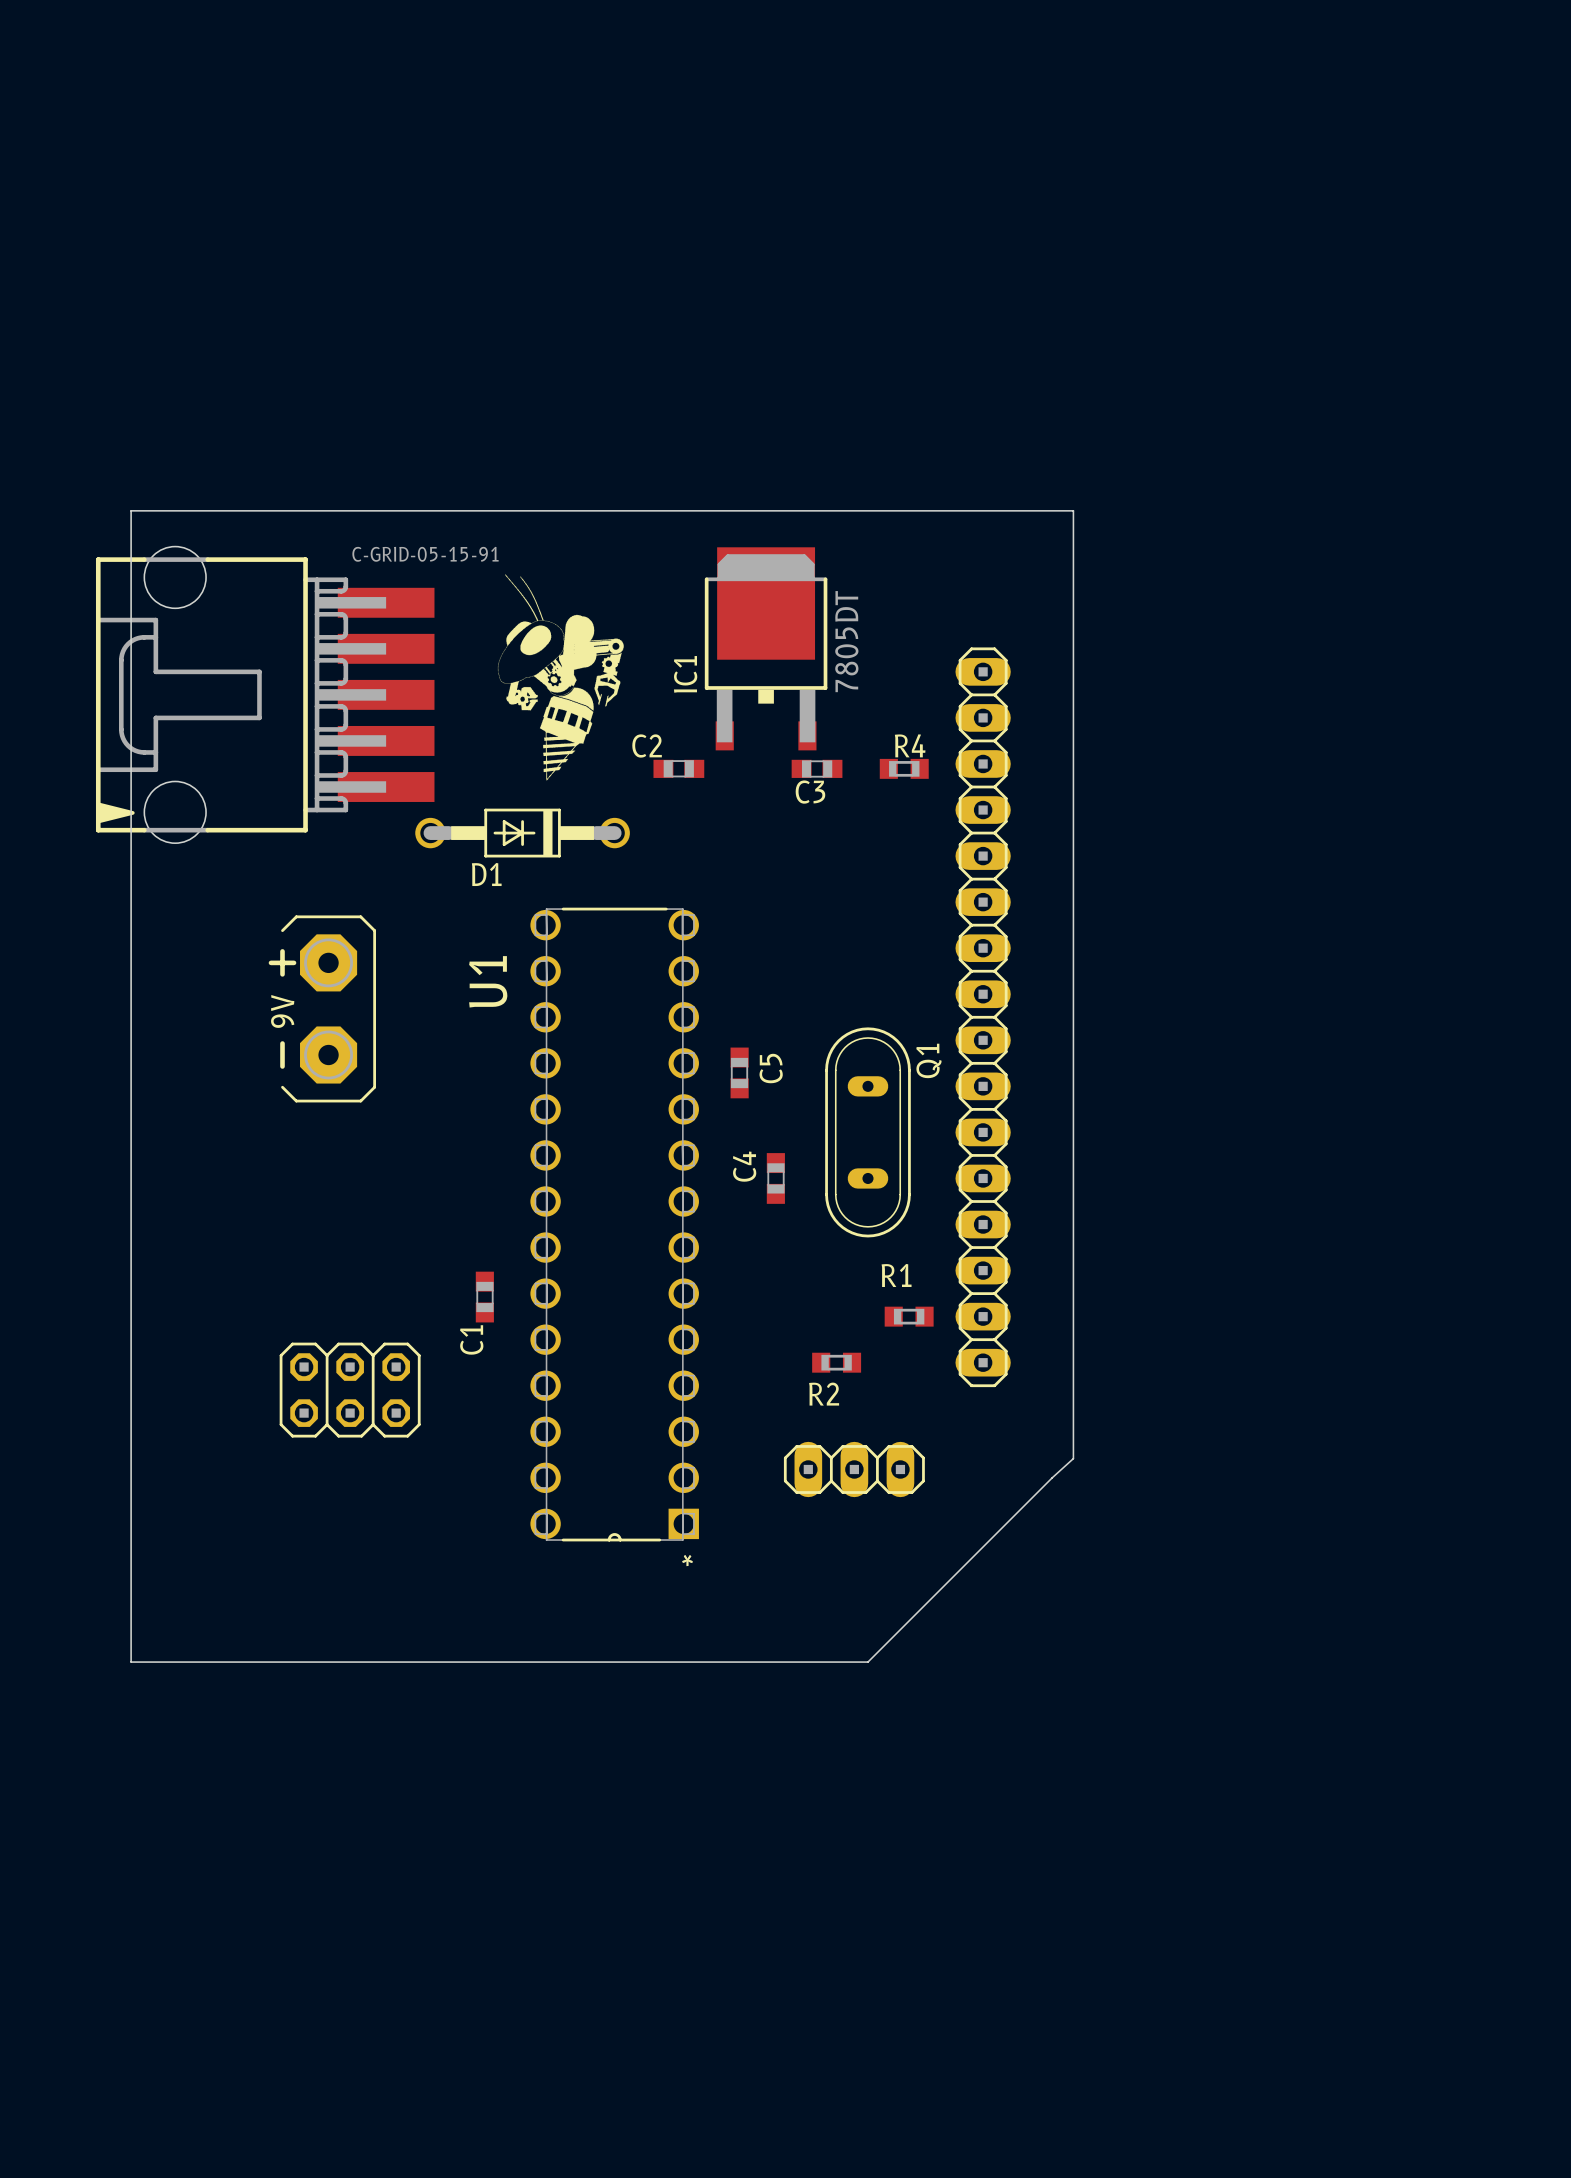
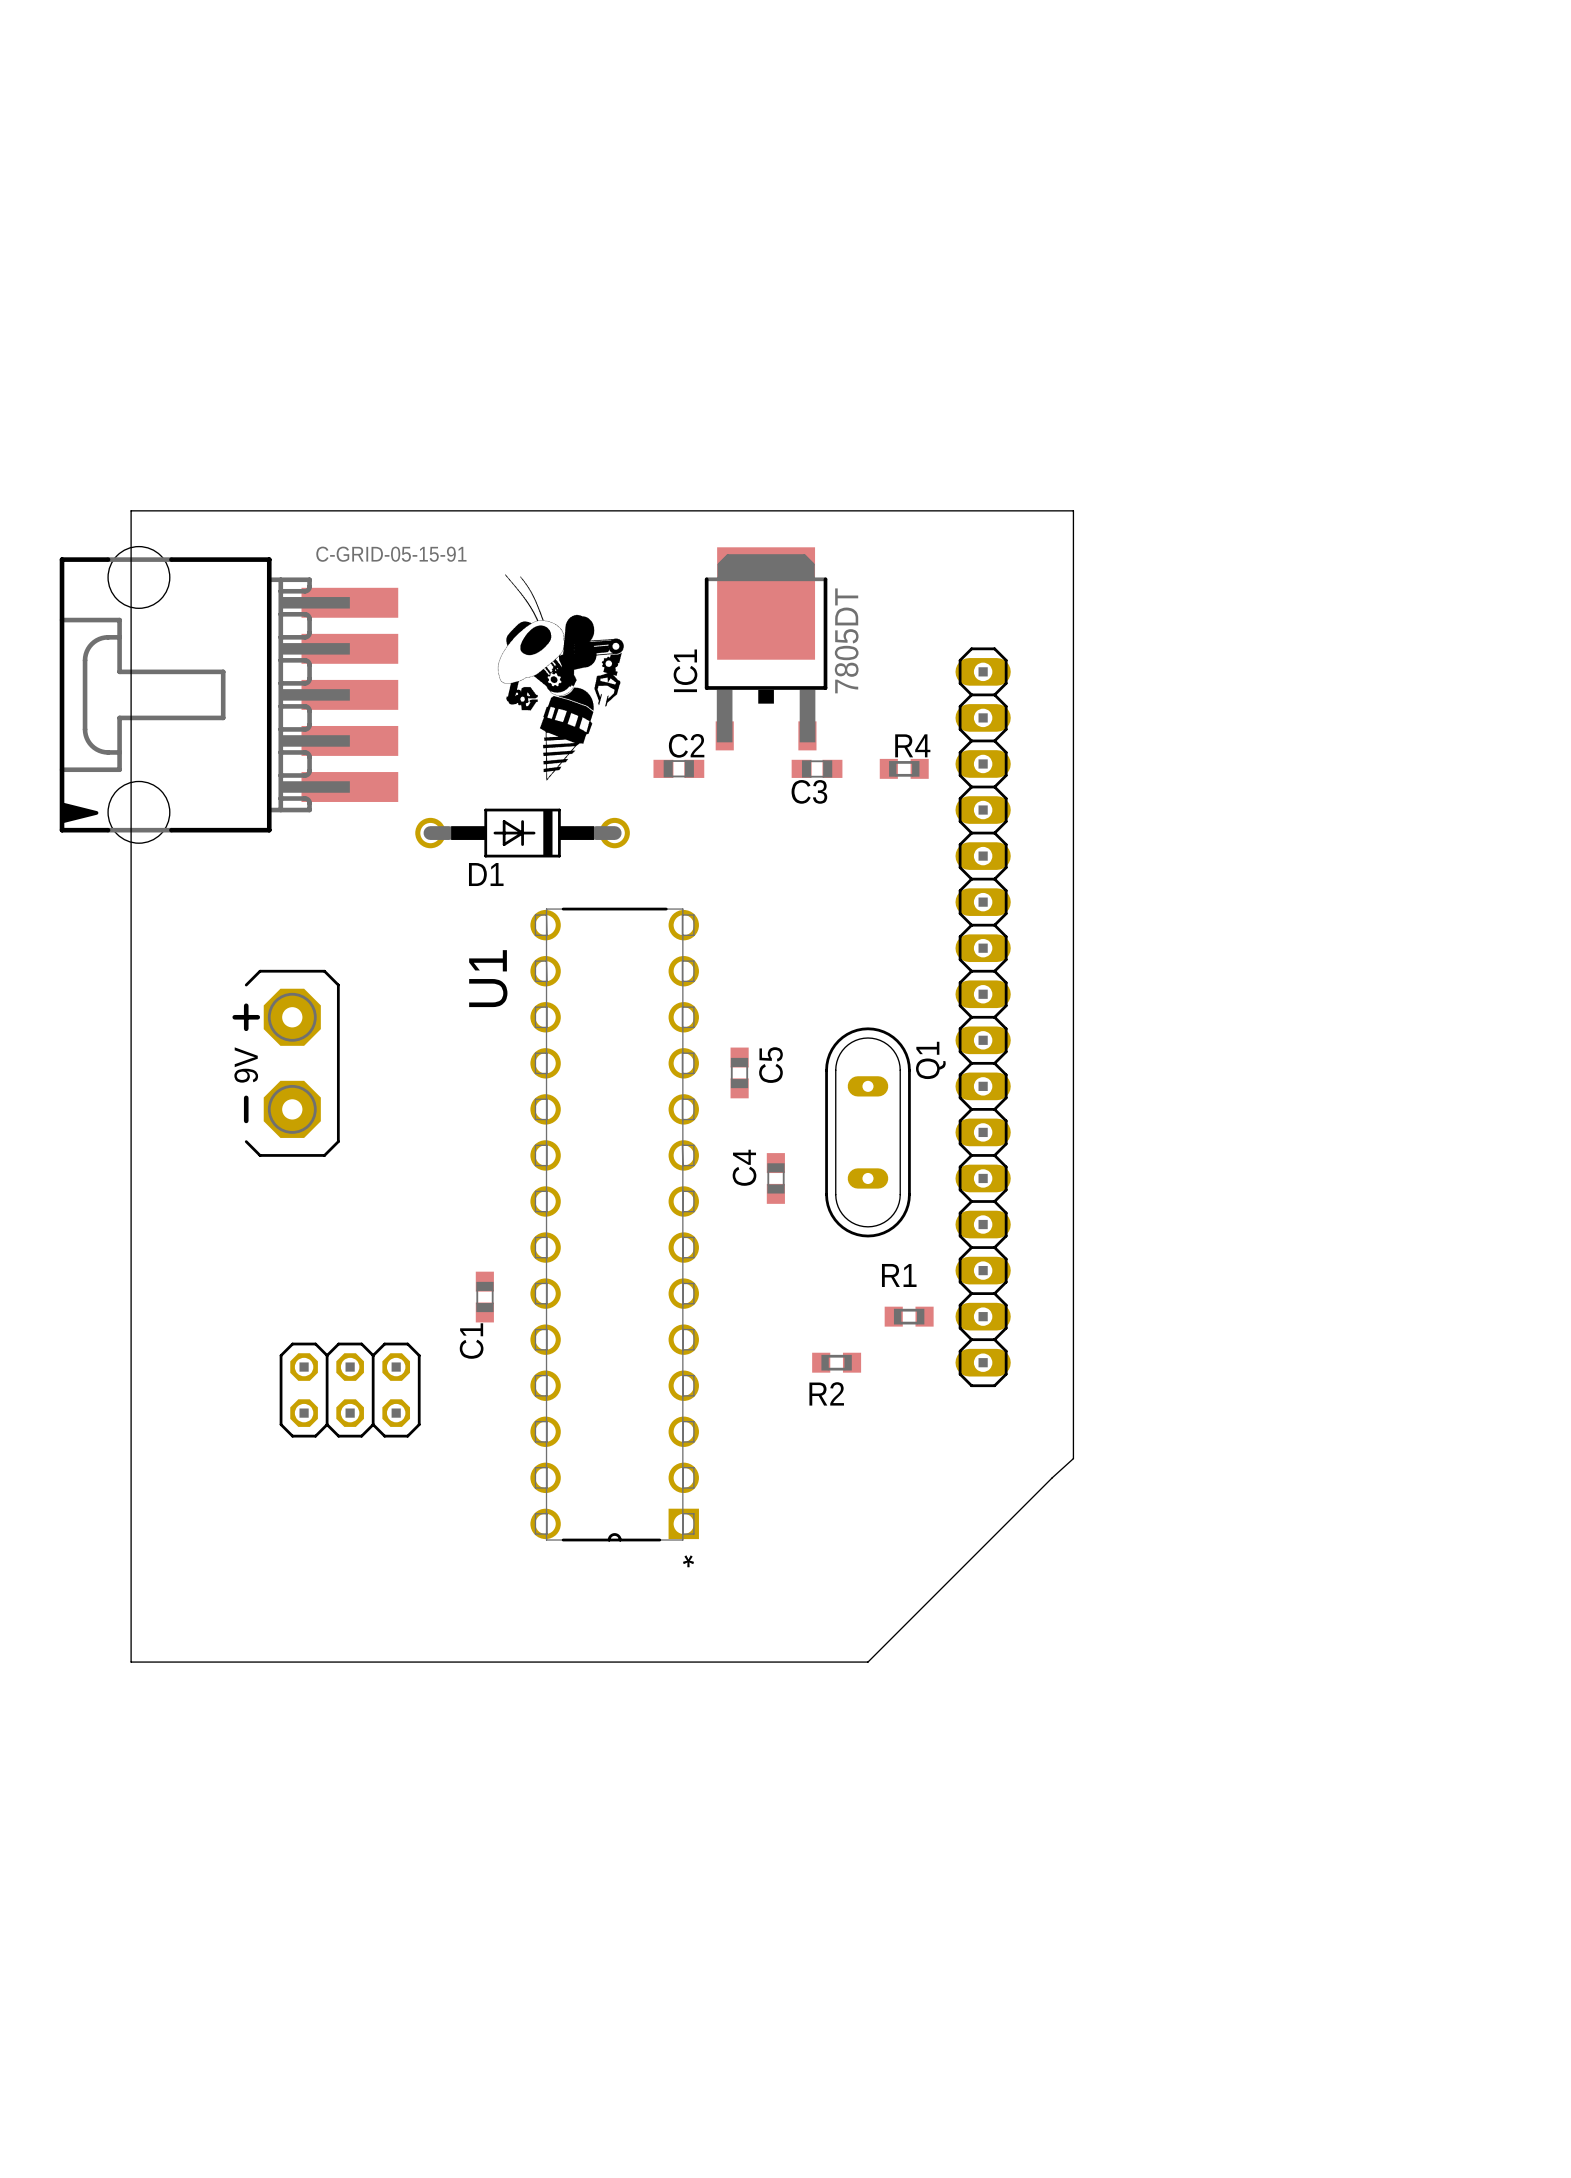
part position: (265, 694) -> (228, 694)
C2 name position: C2 (647, 745) -> C2 (686, 745)
part position: (322, 1008) -> (286, 1063)
part: (854, 1469) -> none

